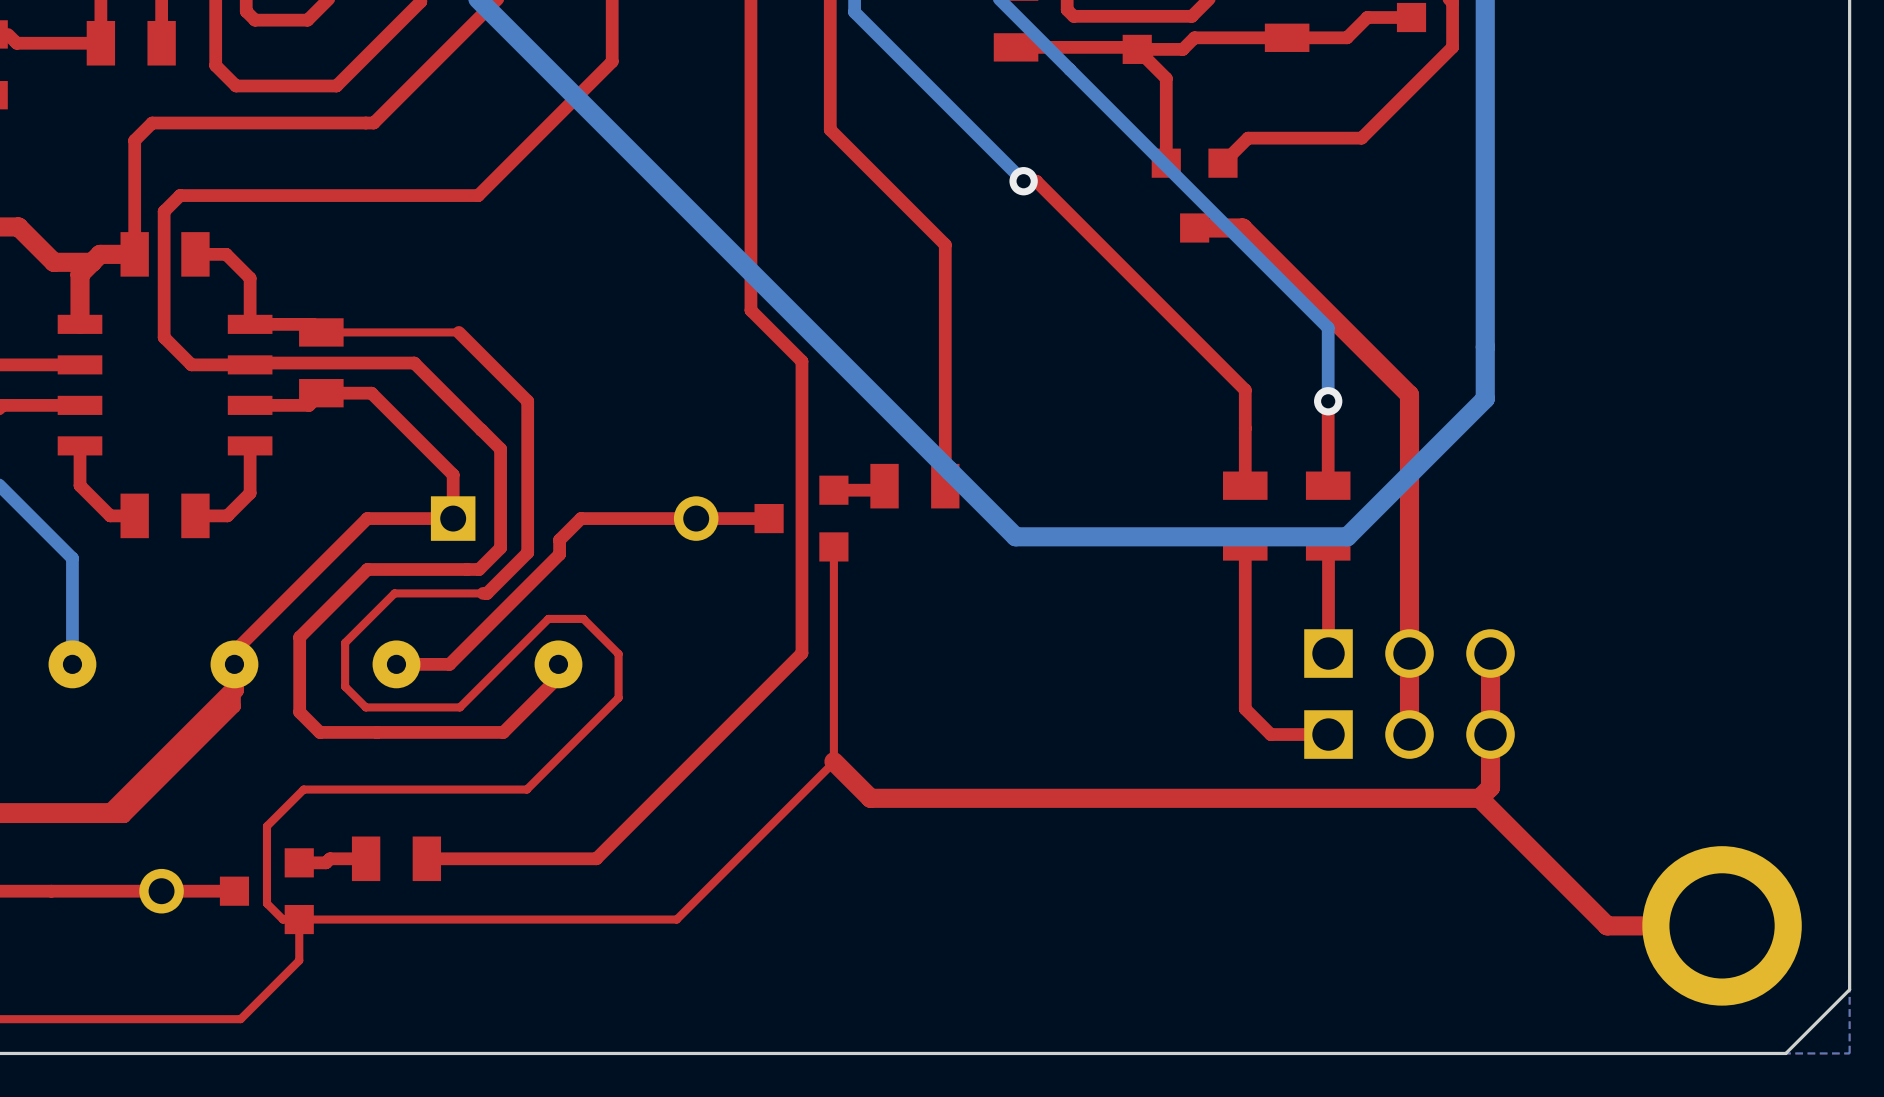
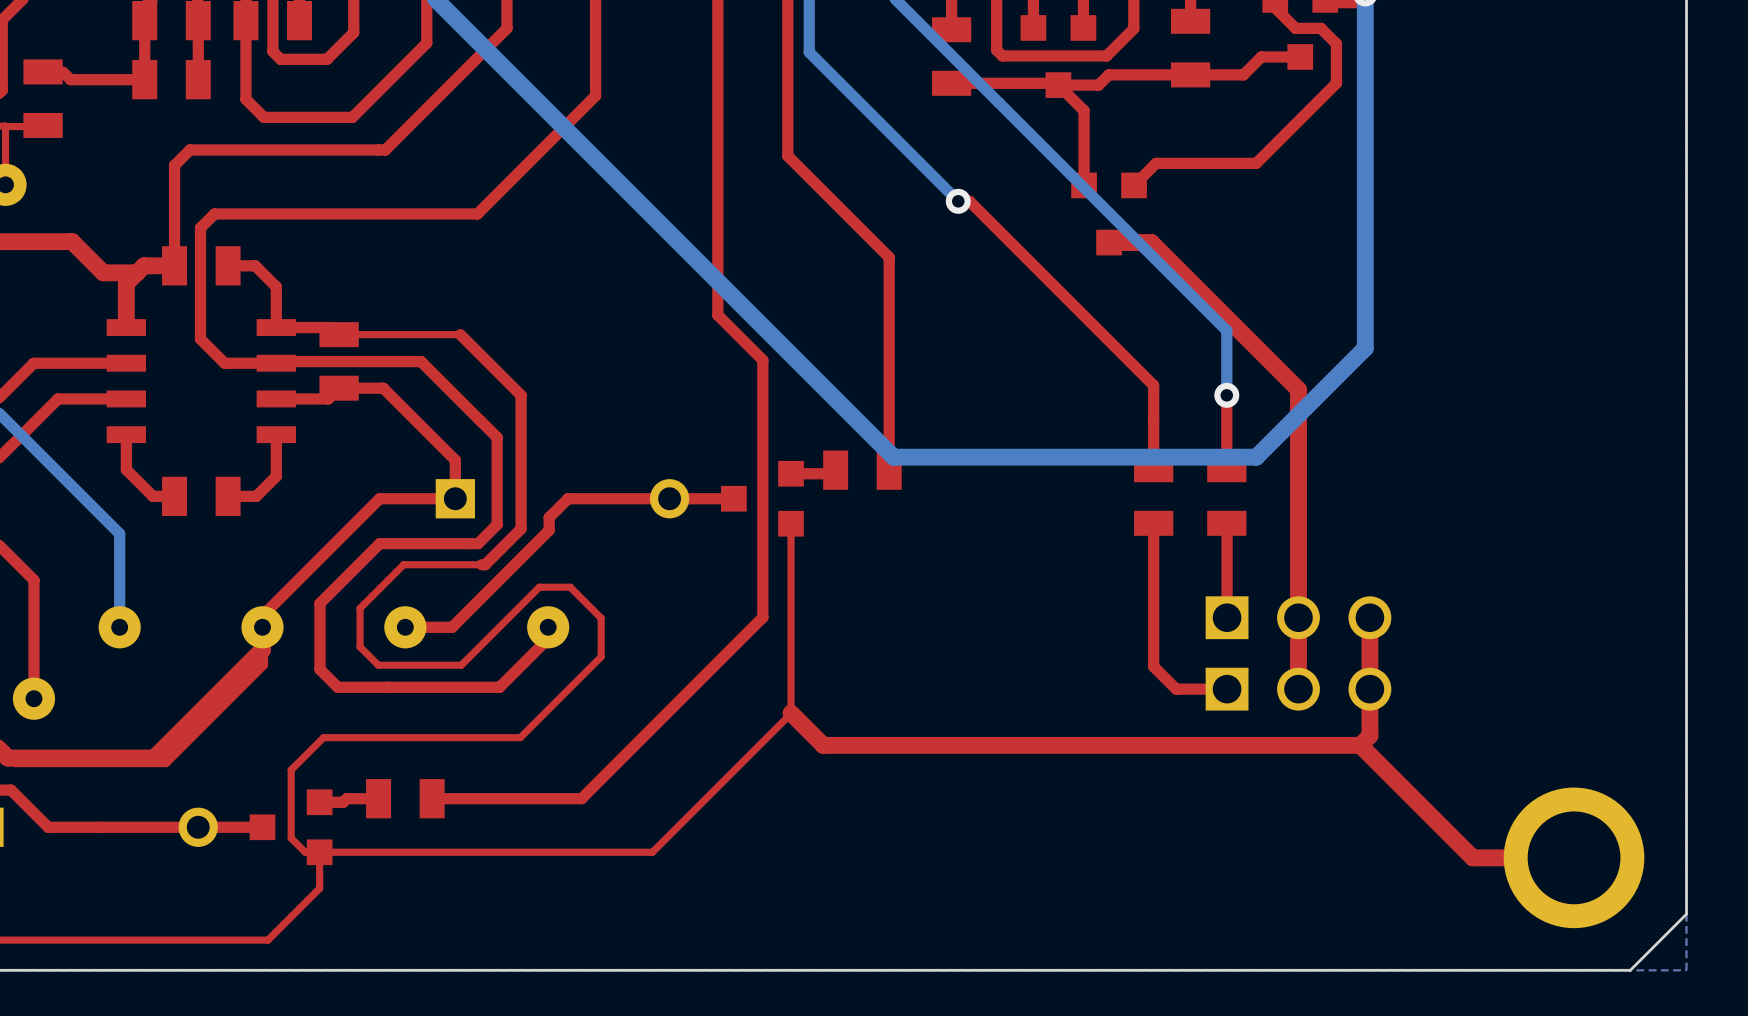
bottom track: (1485, 347) (1485, 398) (1347, 536) (1015, 536) (950, 471) -> (1365, 348) (1256, 457) (893, 457)

